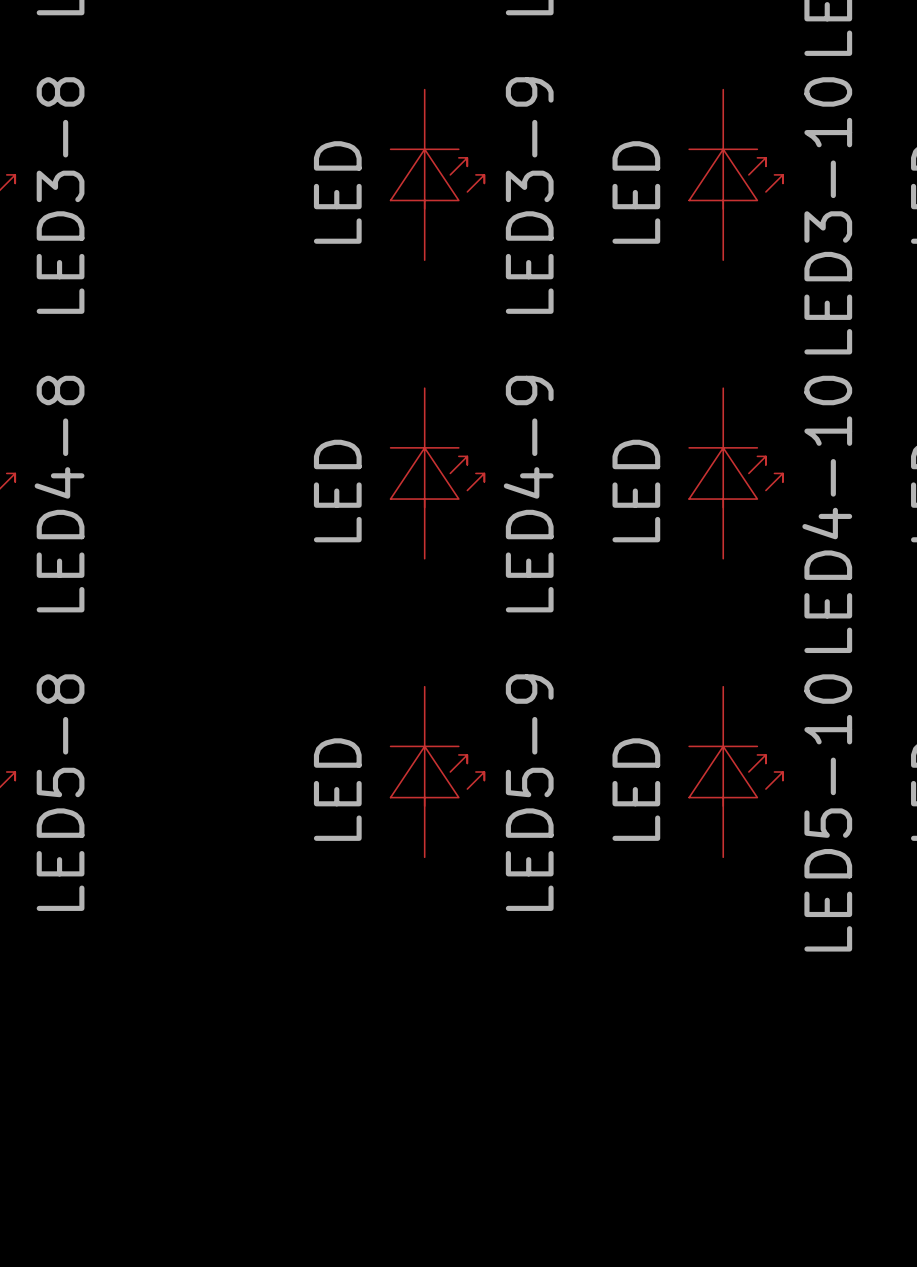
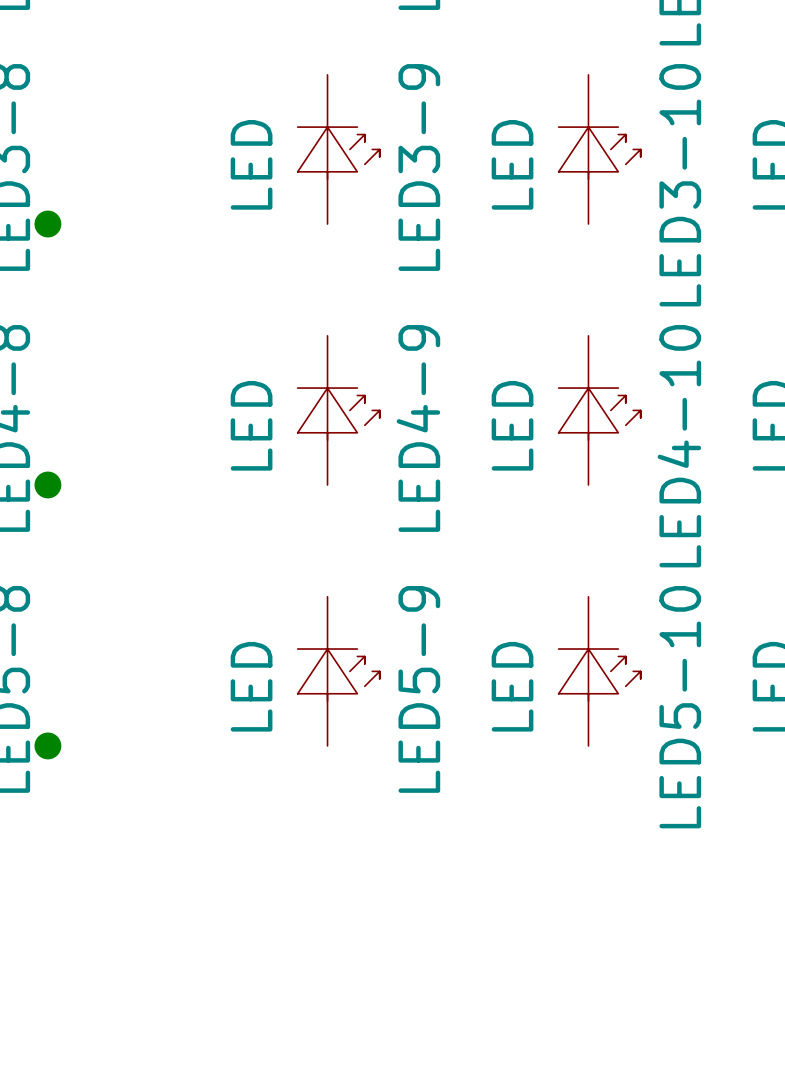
junction: none -> (47, 224)
junction: none -> (47, 484)
junction: none -> (47, 745)

